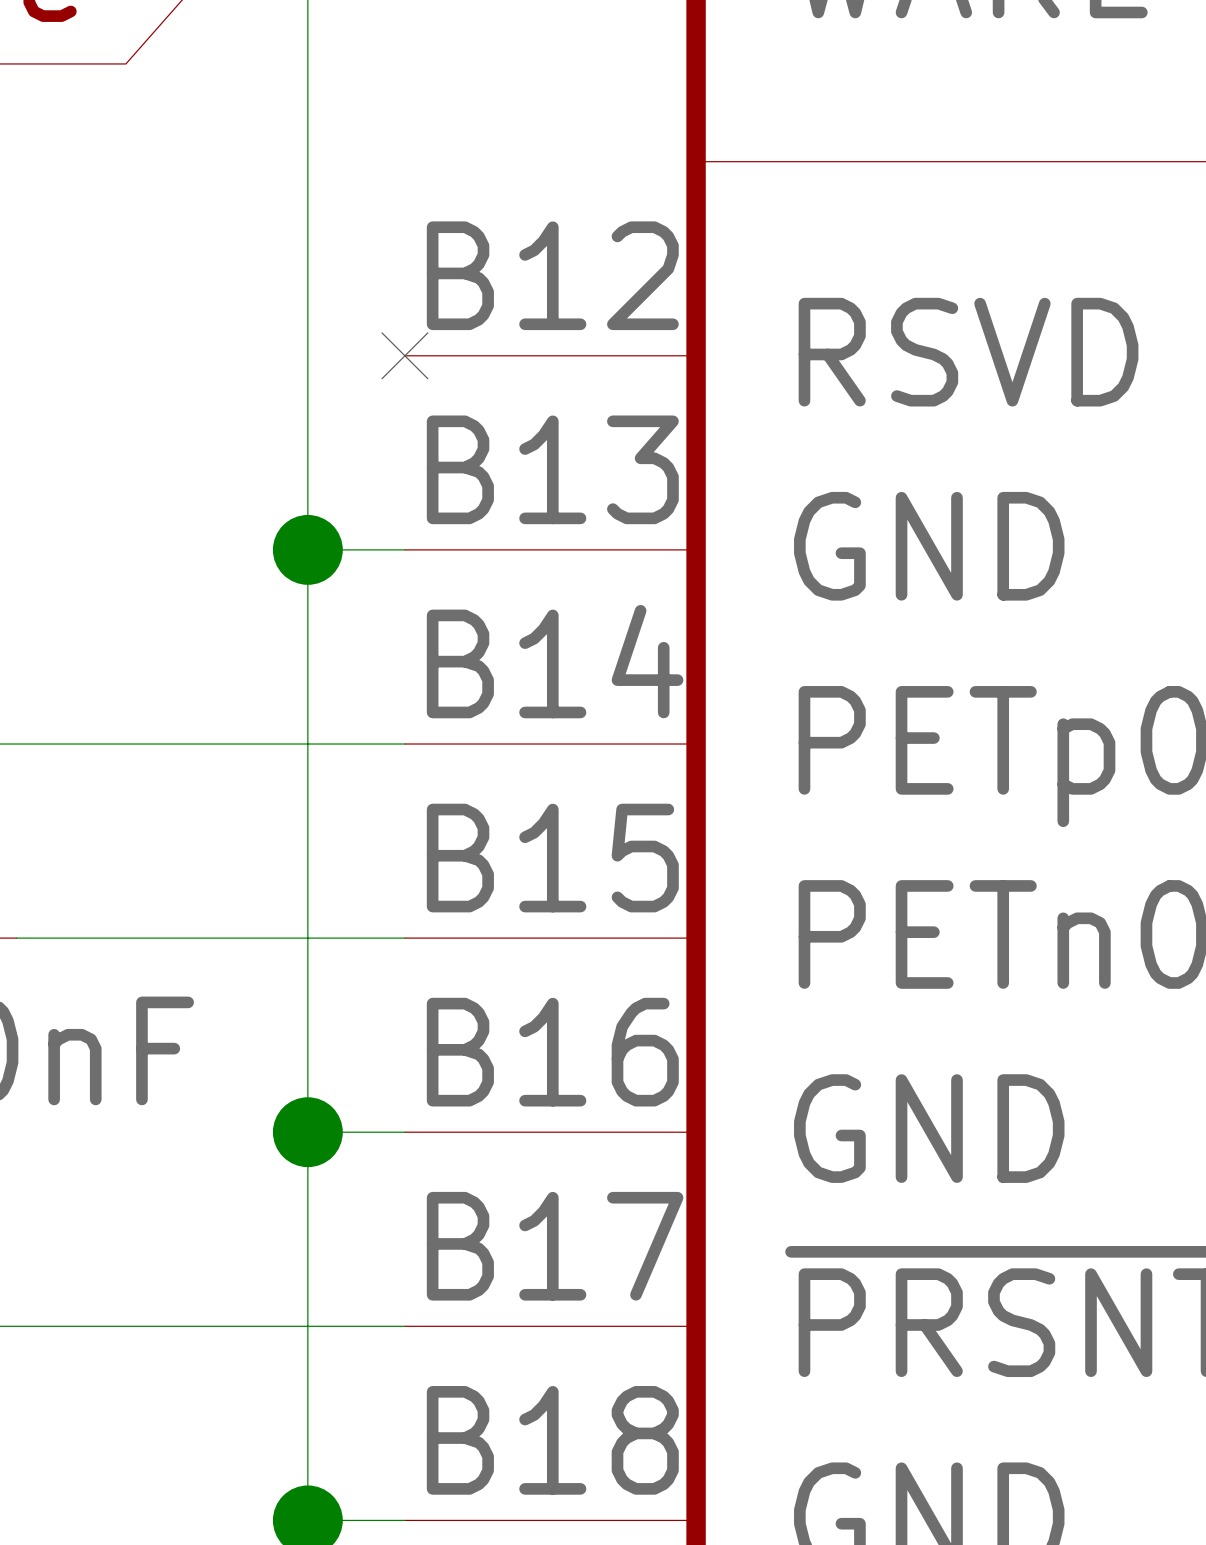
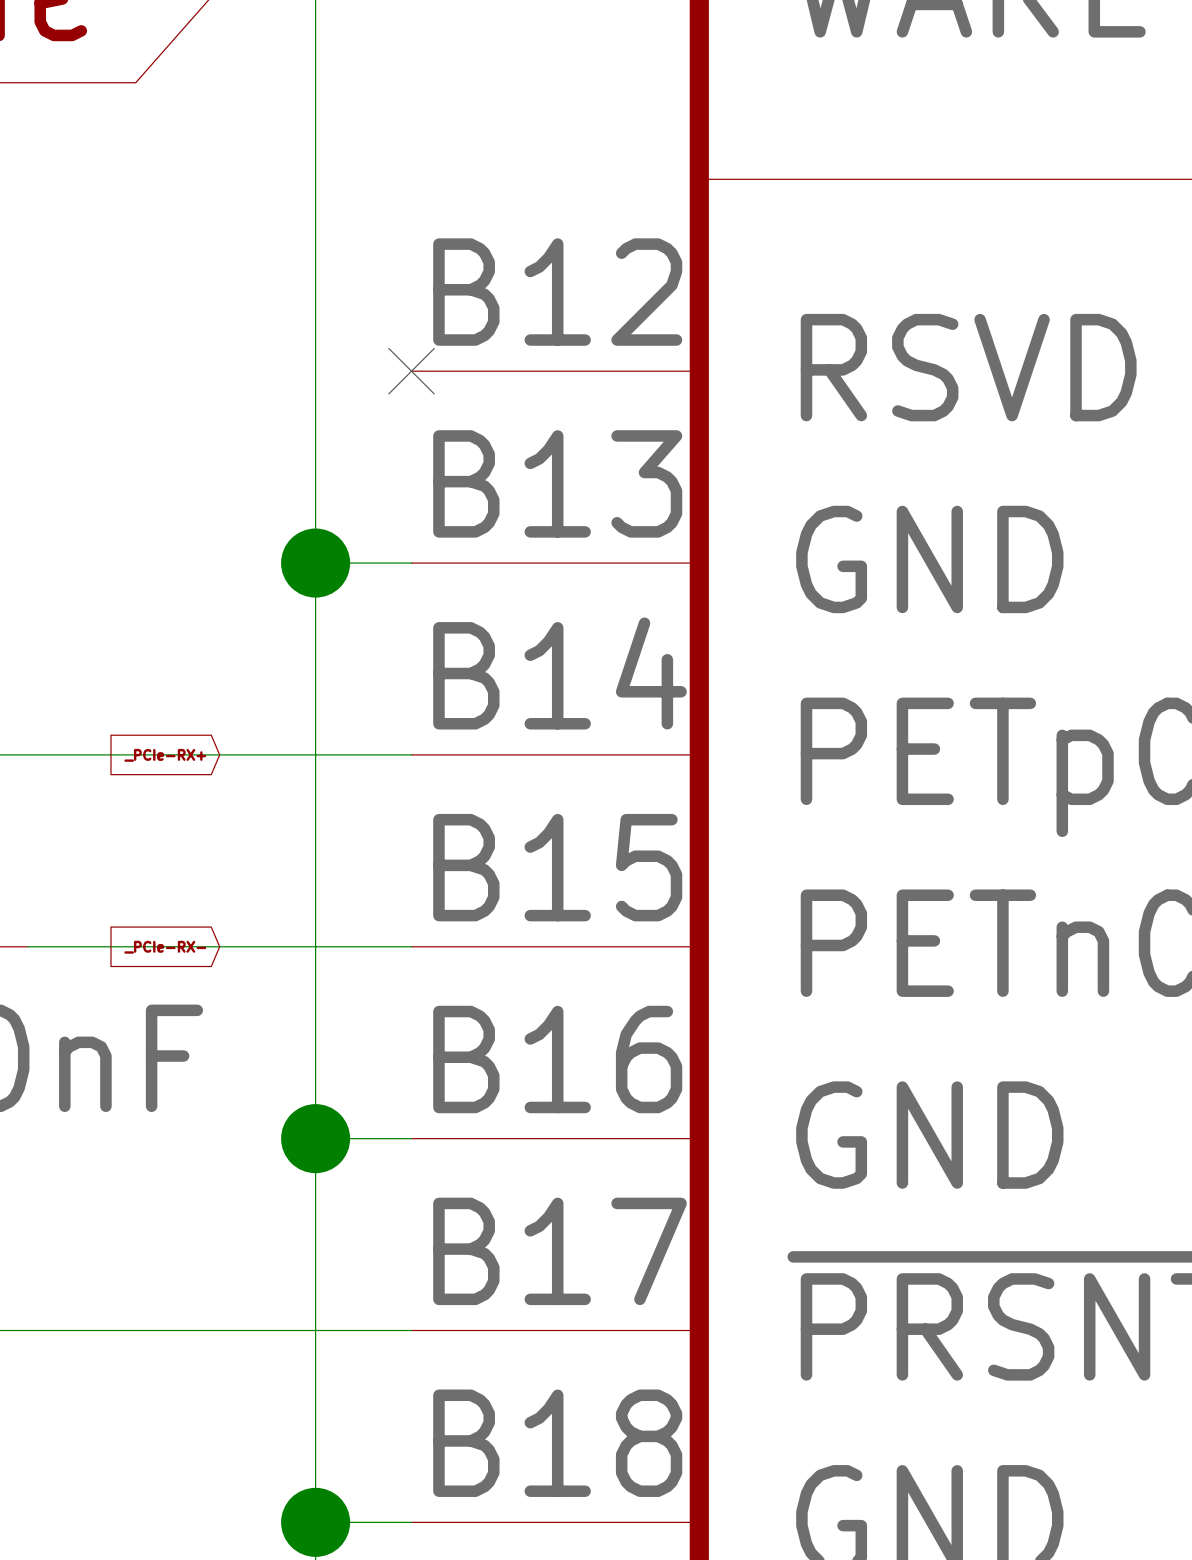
global label: none -> _PCIe-RX+ (165, 755)
global label: none -> _PCIe-RX- (165, 947)

